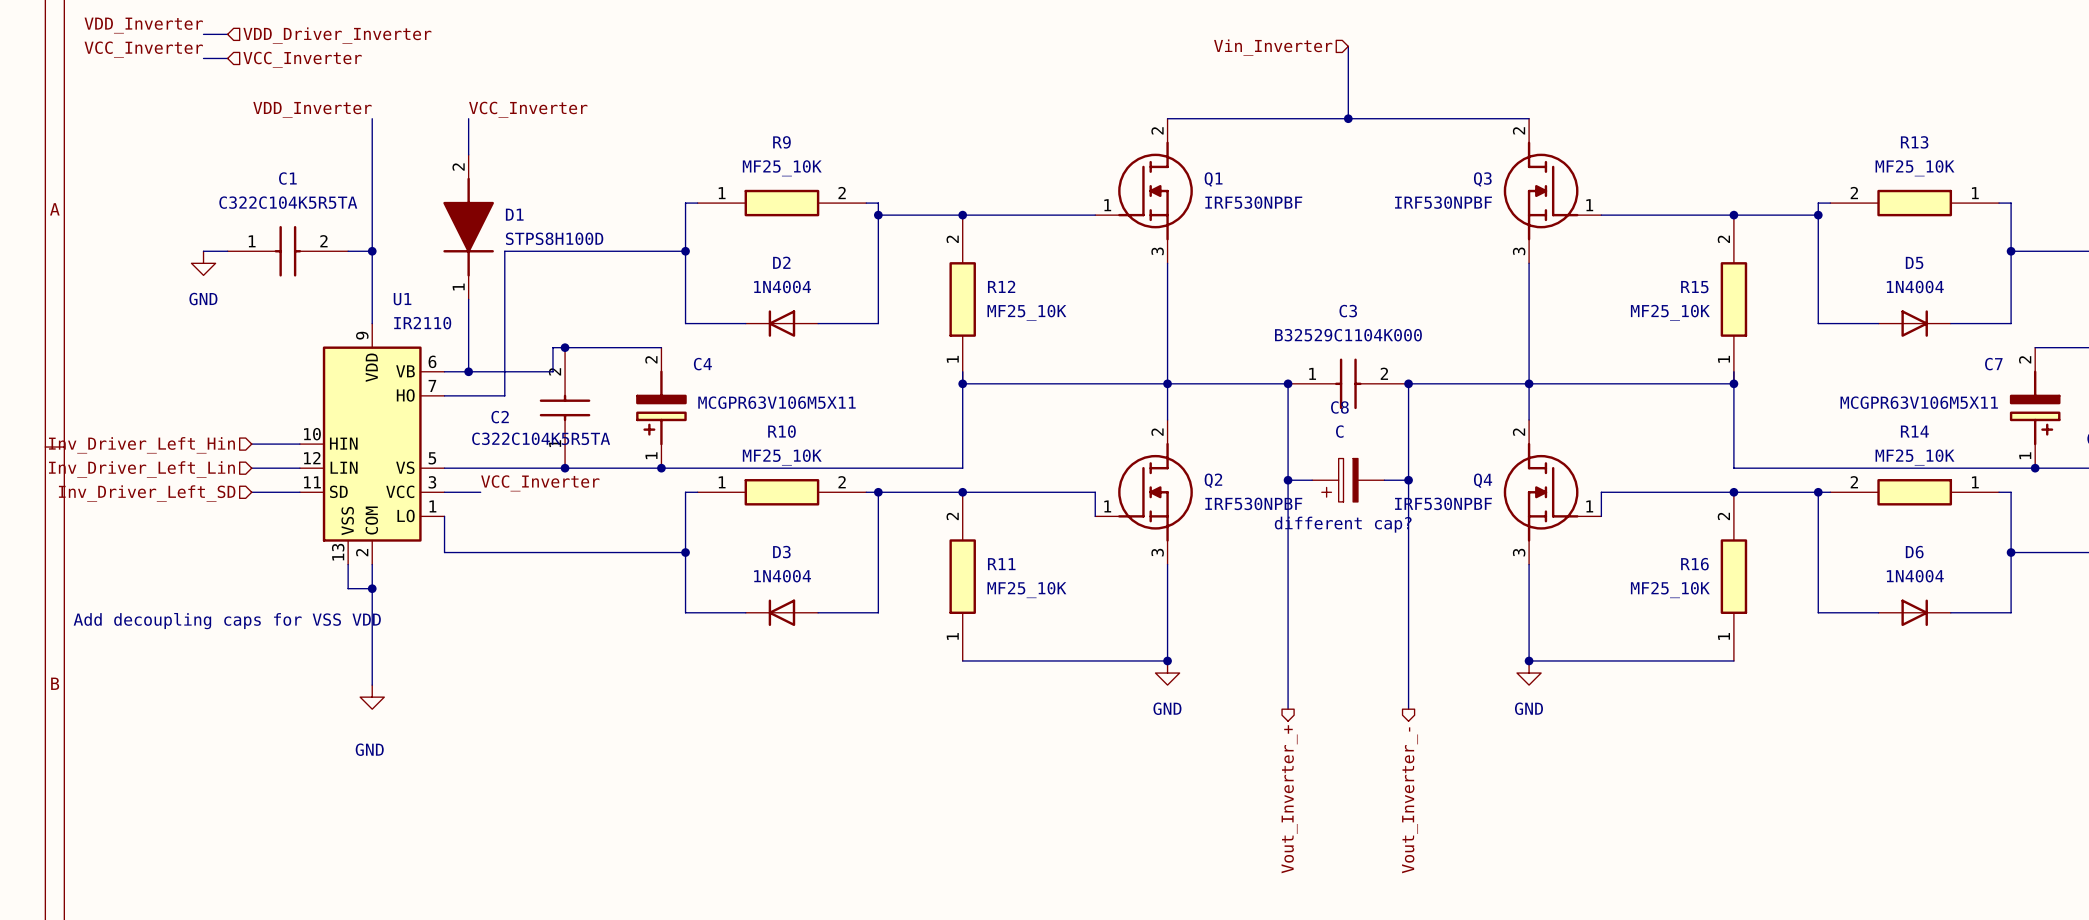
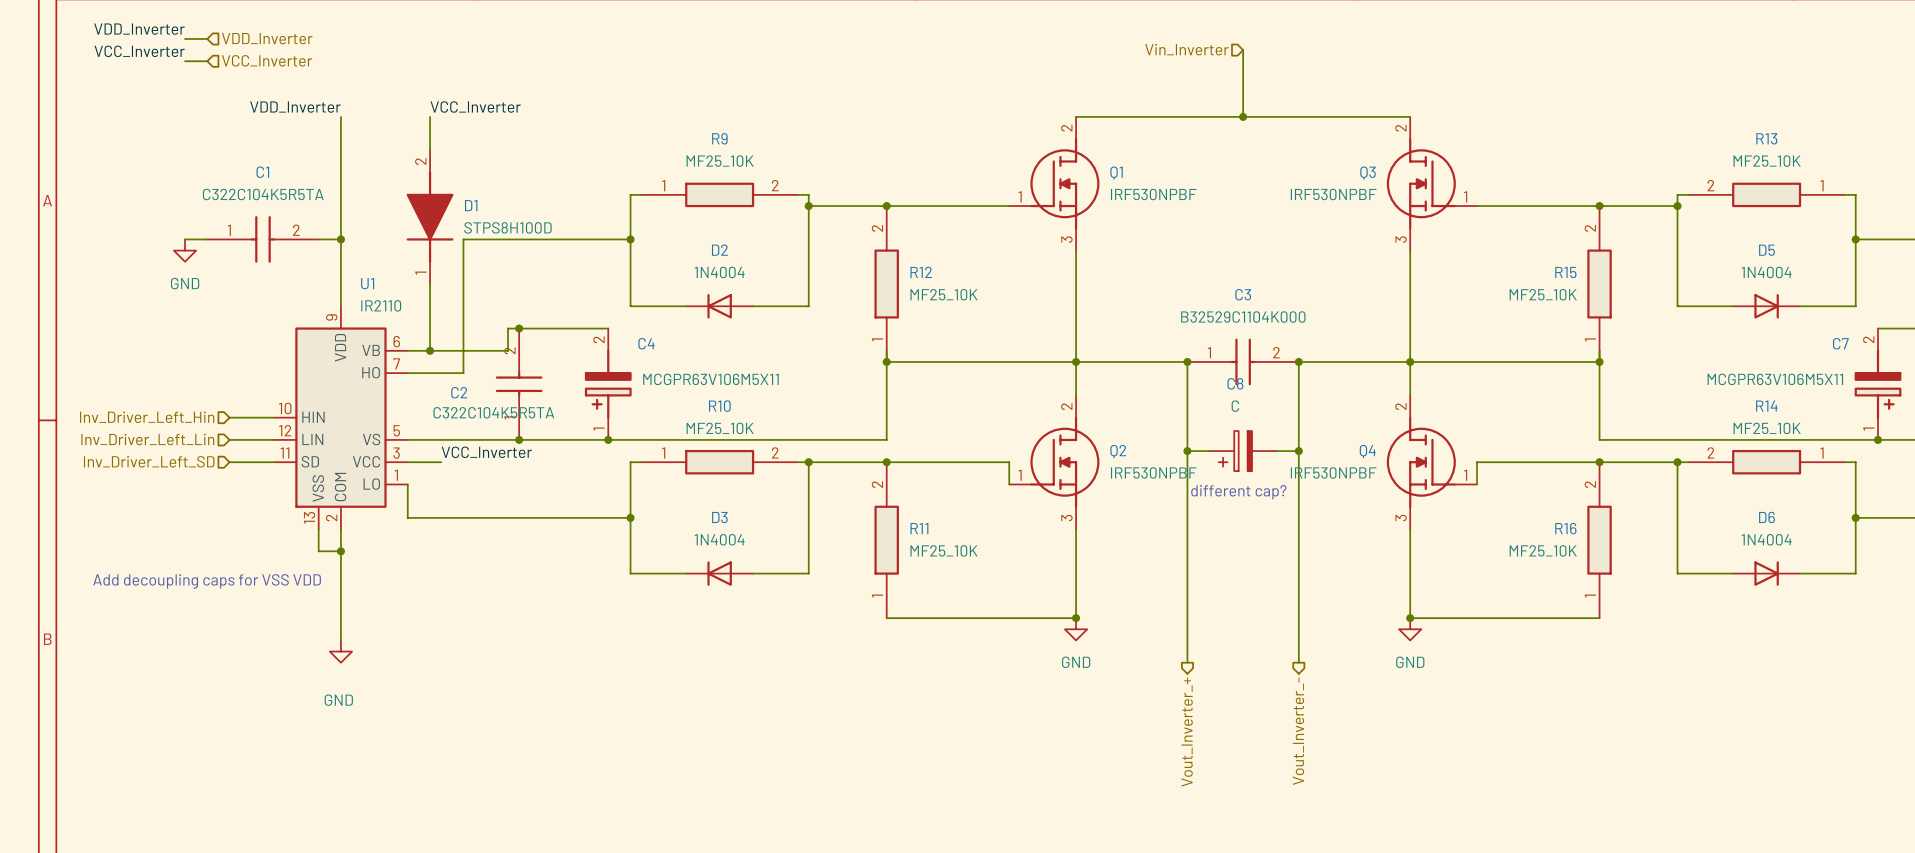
hierarchical label: VDD_Driver_Inverter (337, 35) -> VDD_Inverter (267, 38)

